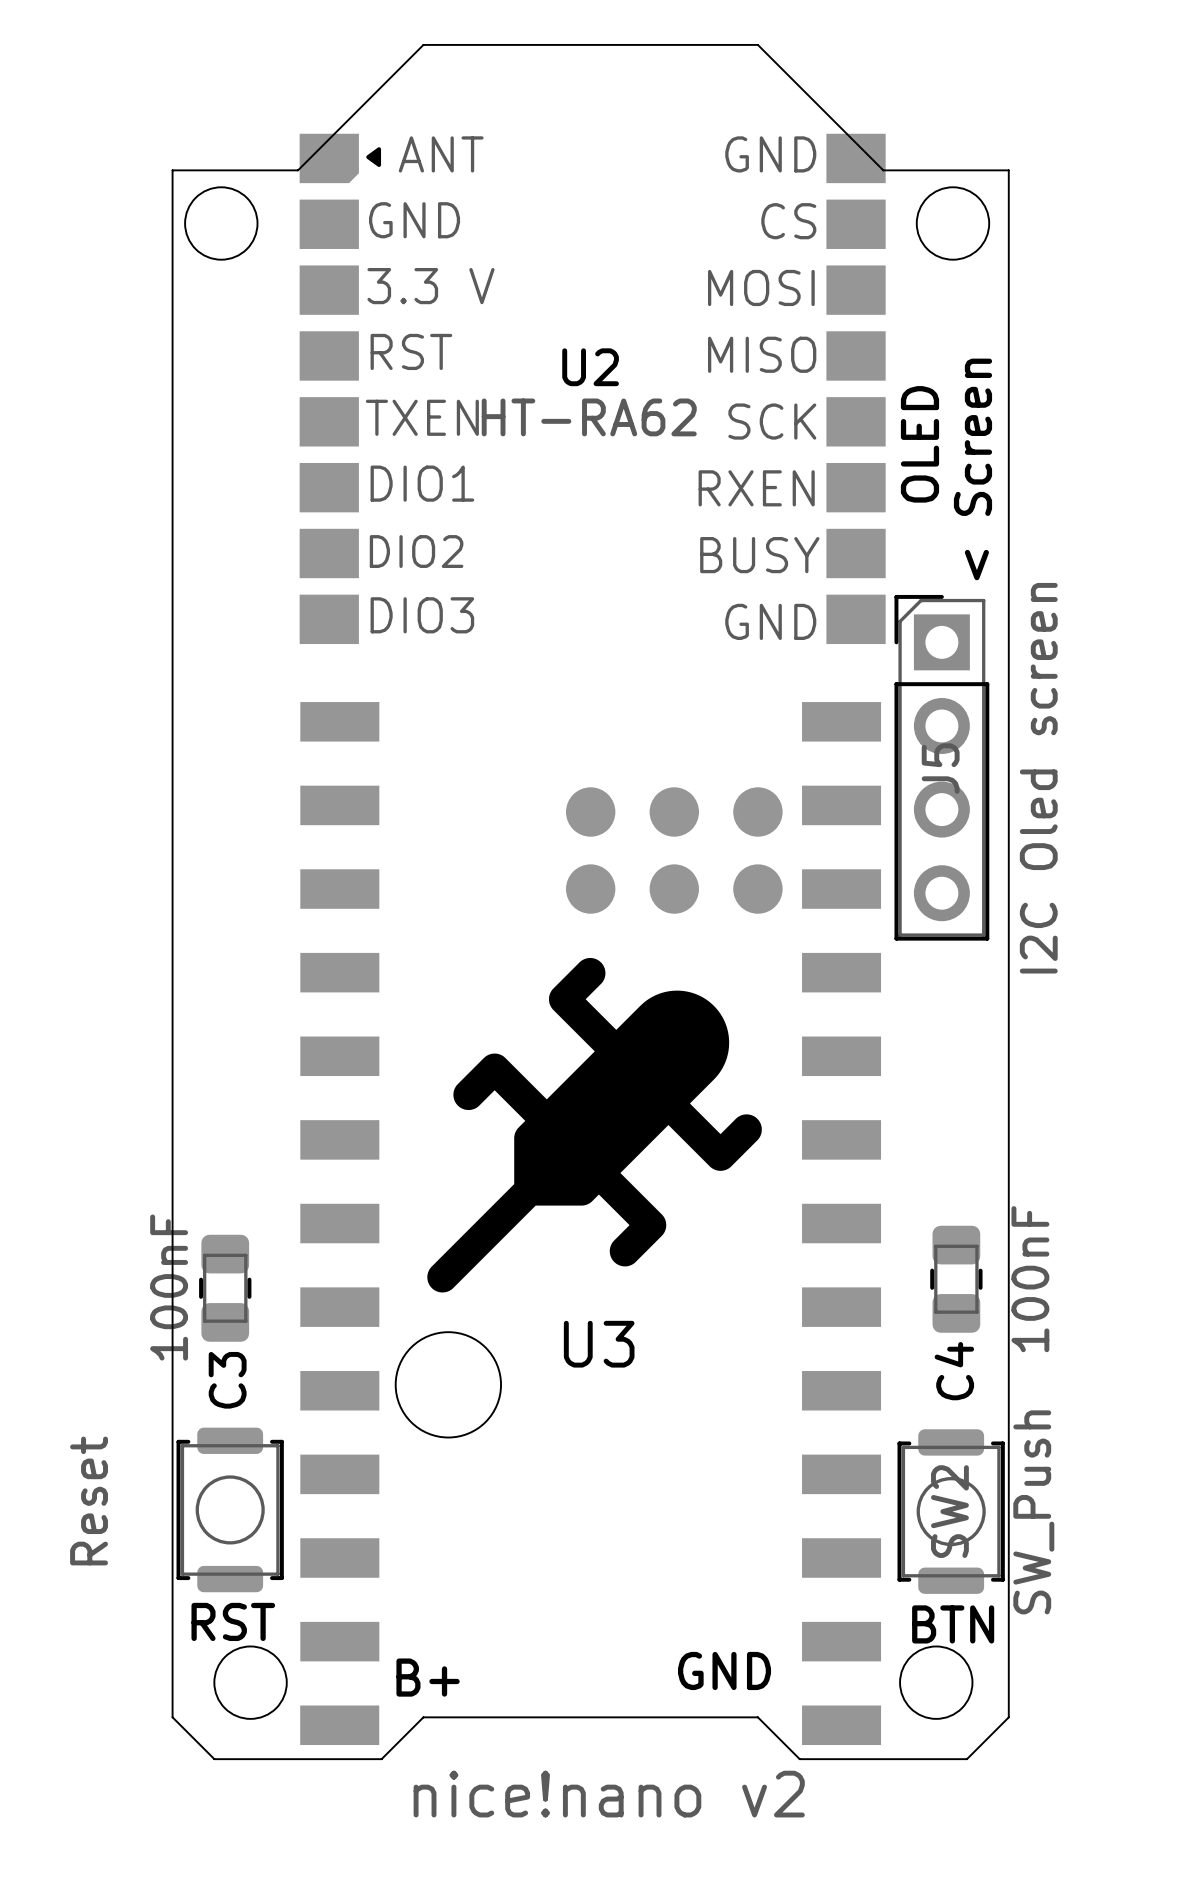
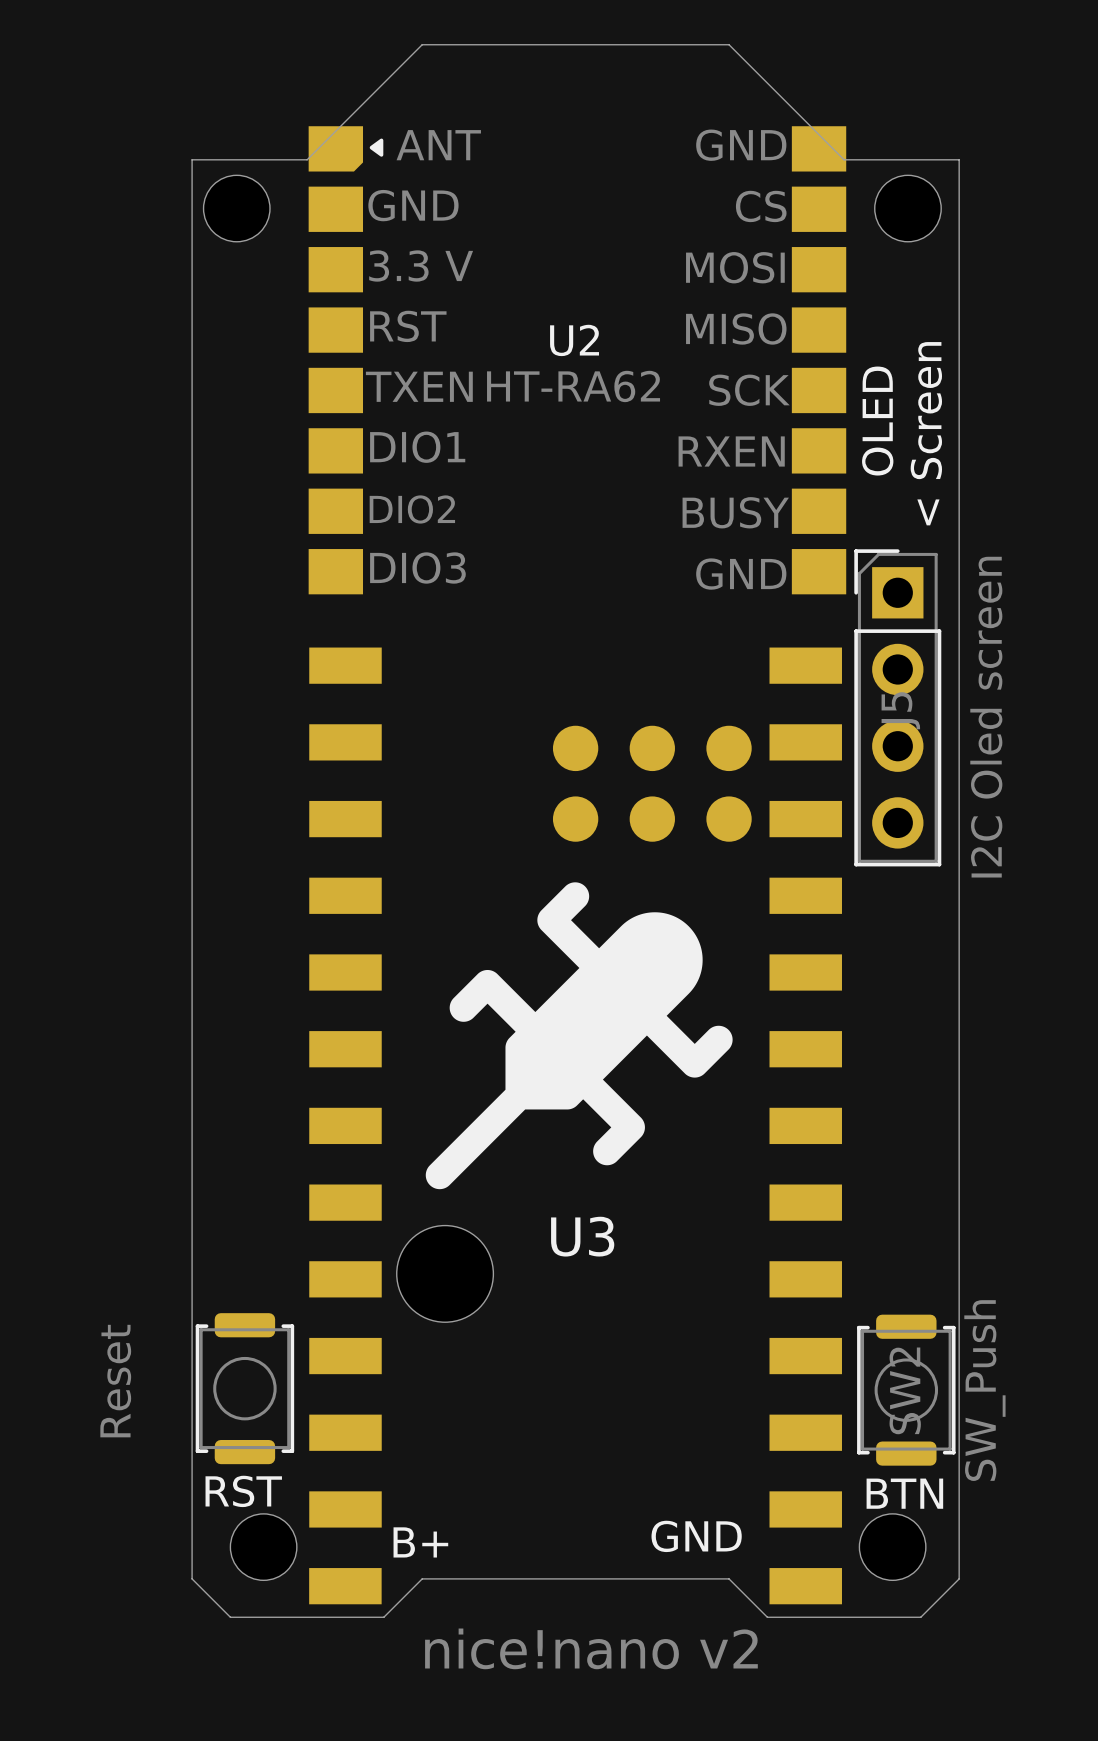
C4: 100nF (956, 1279) -> none
C3: 100nF (225, 1288) -> none

